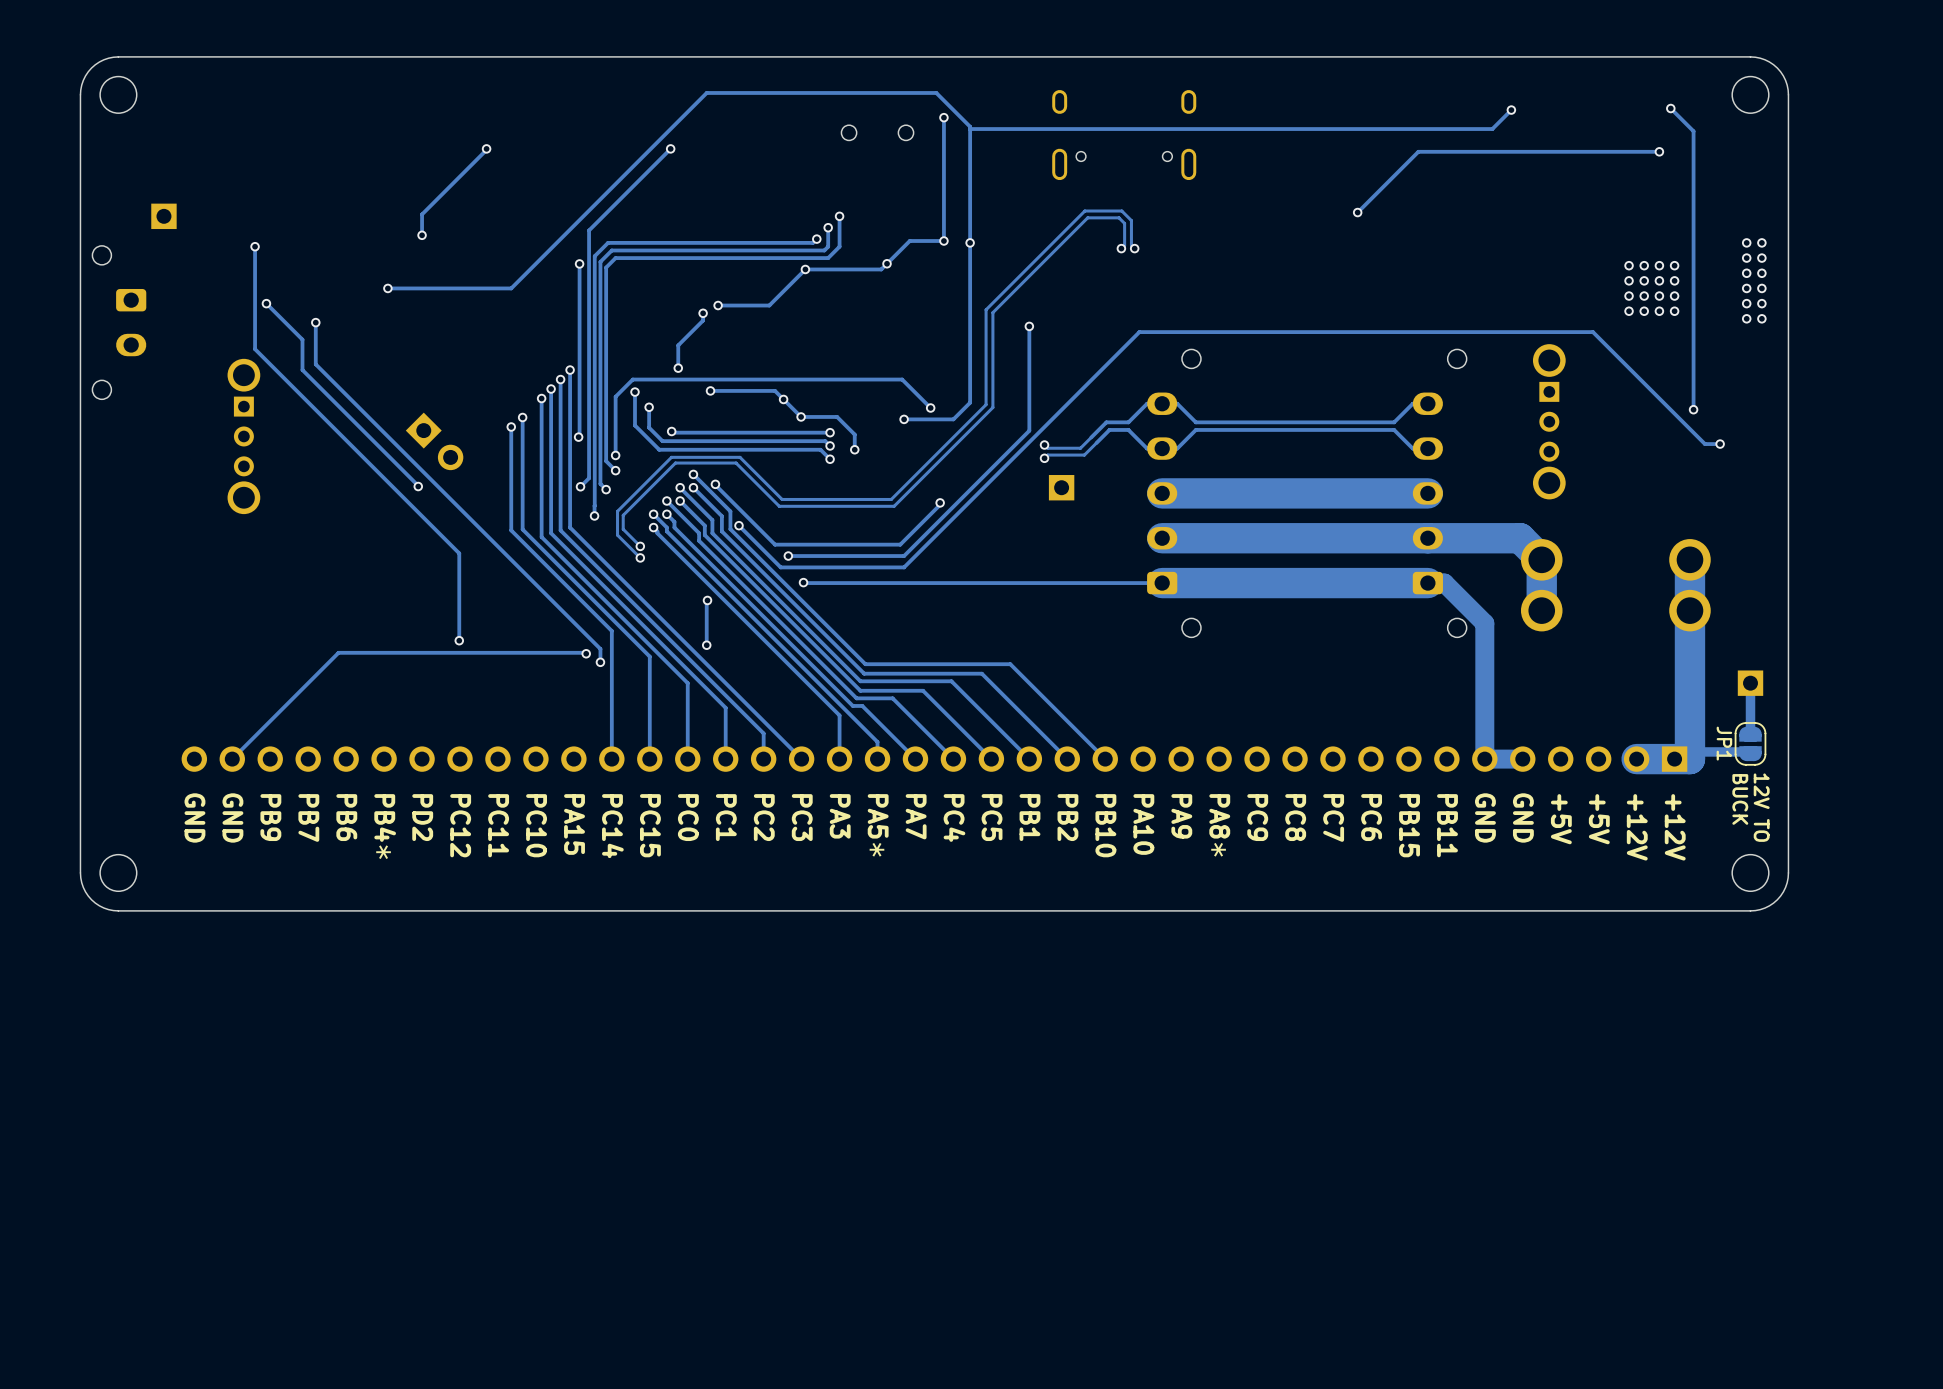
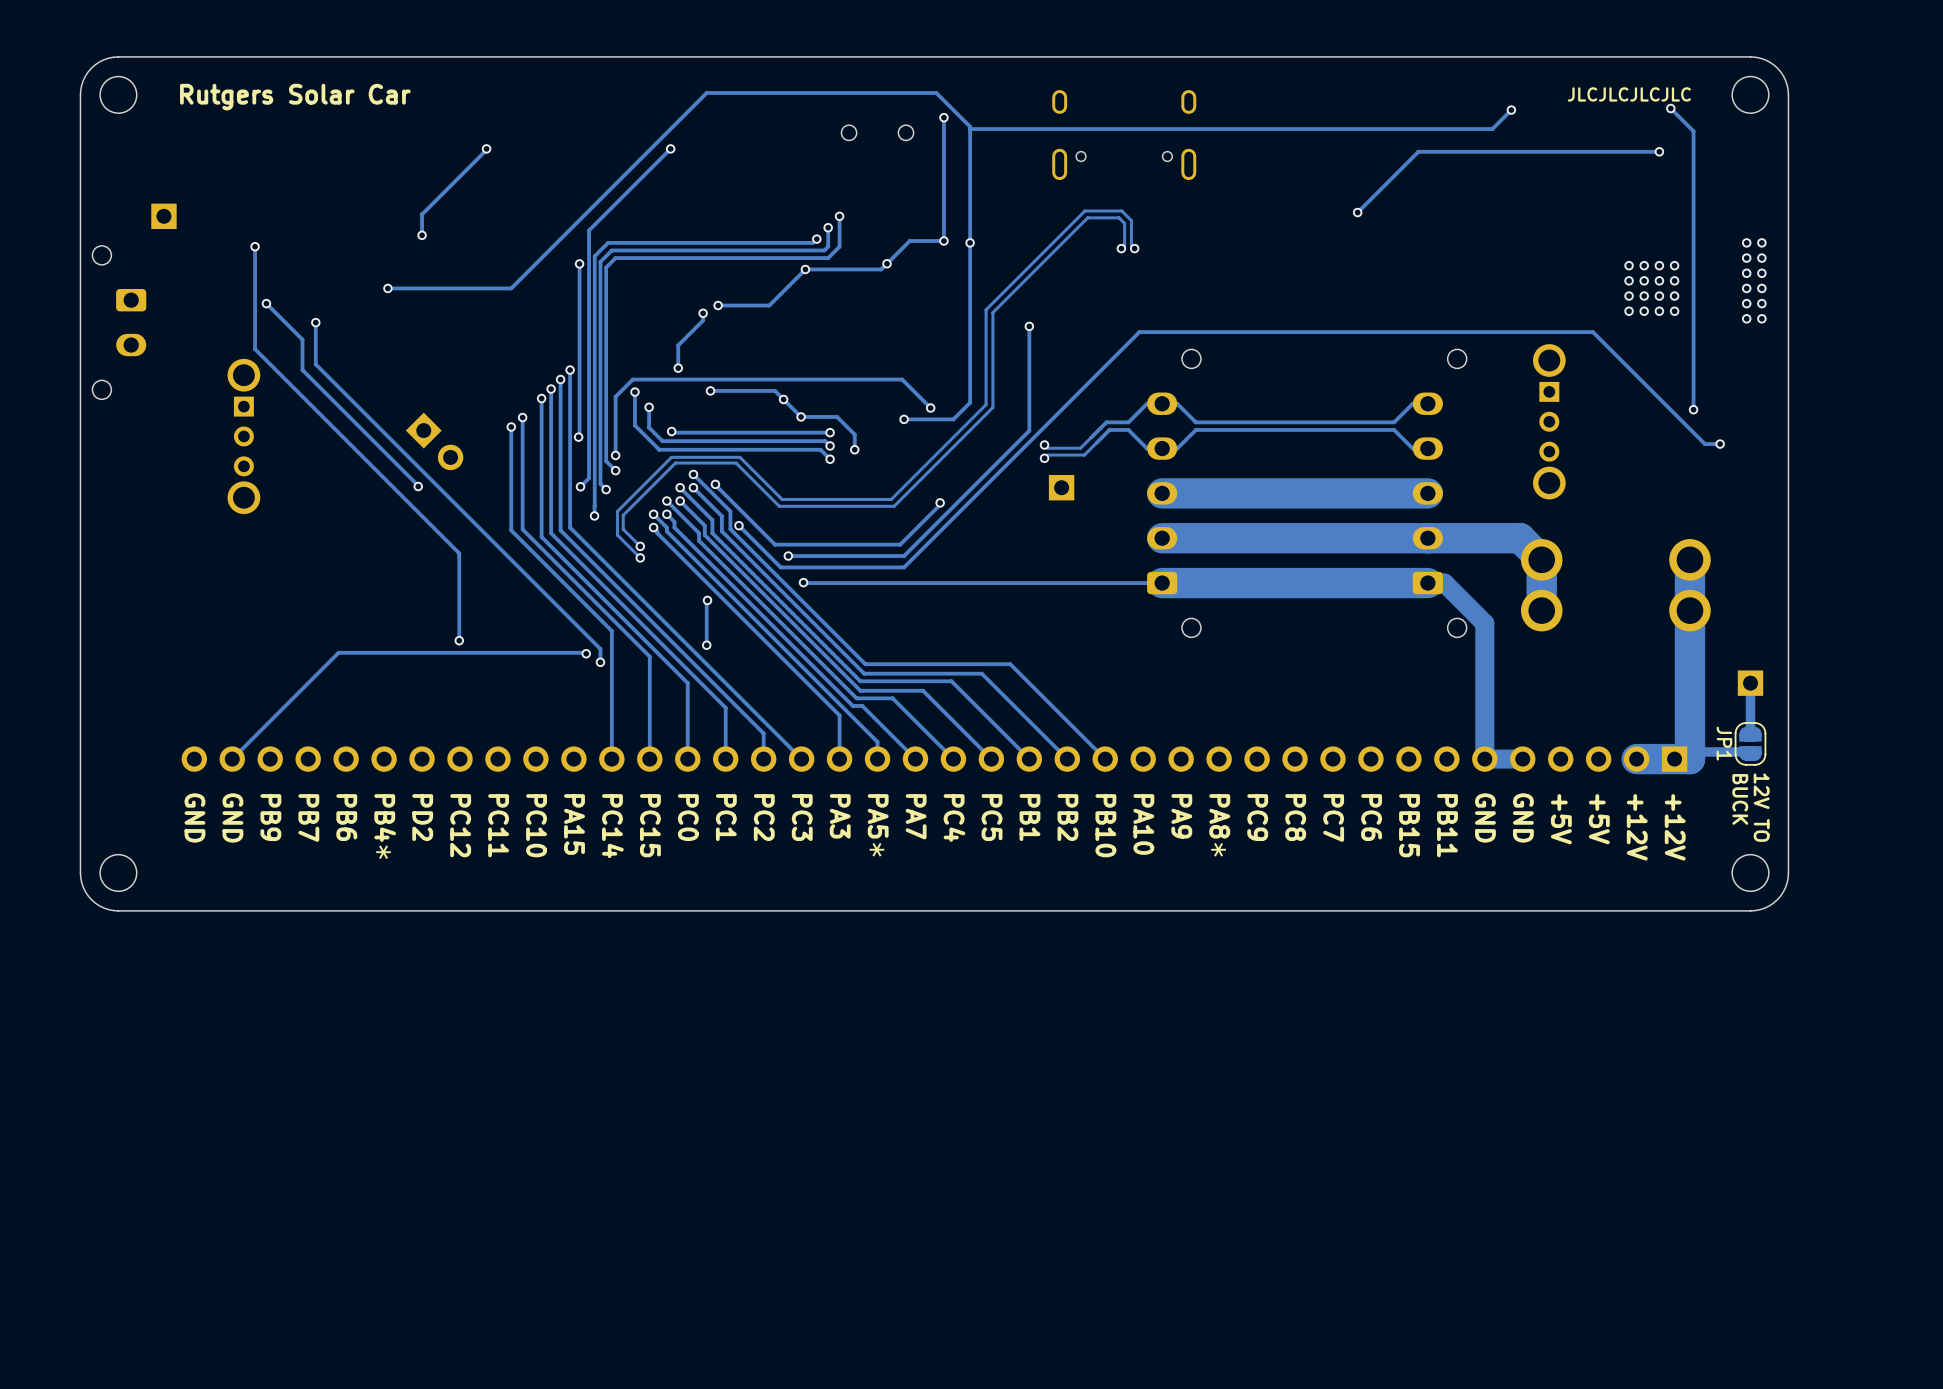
text: none -> JLCJLCJLCJLC (1629, 94)
text: none -> Rutgers Solar Car (295, 97)

